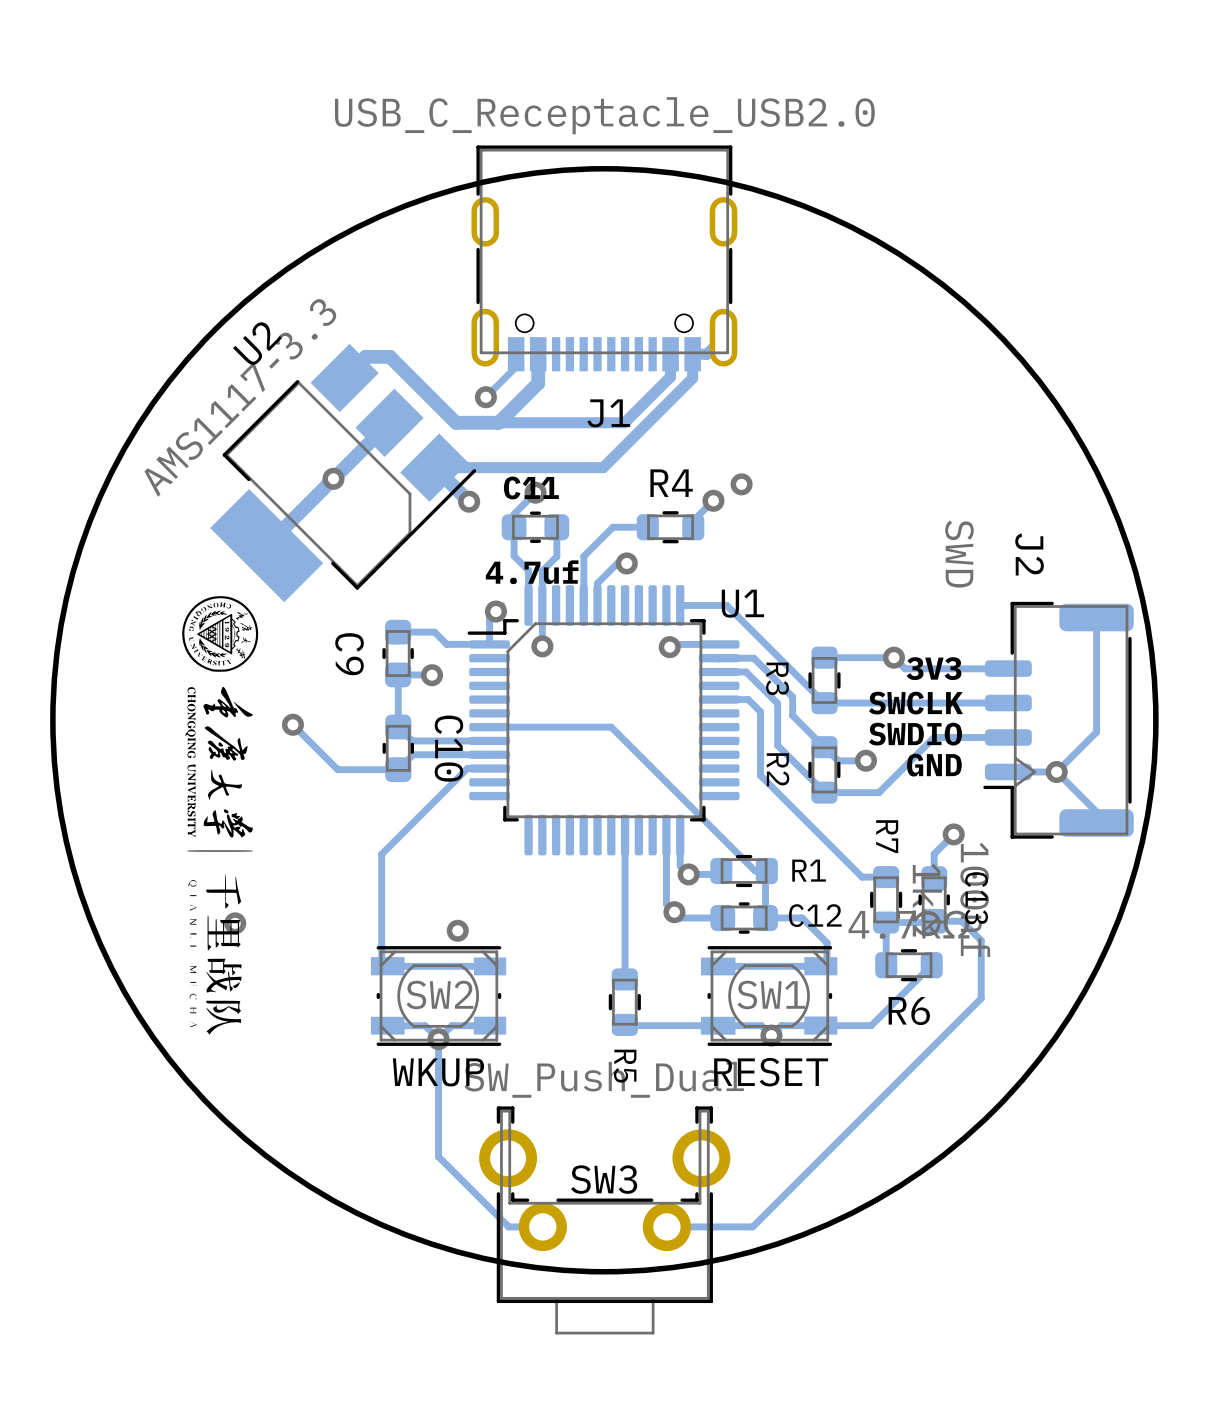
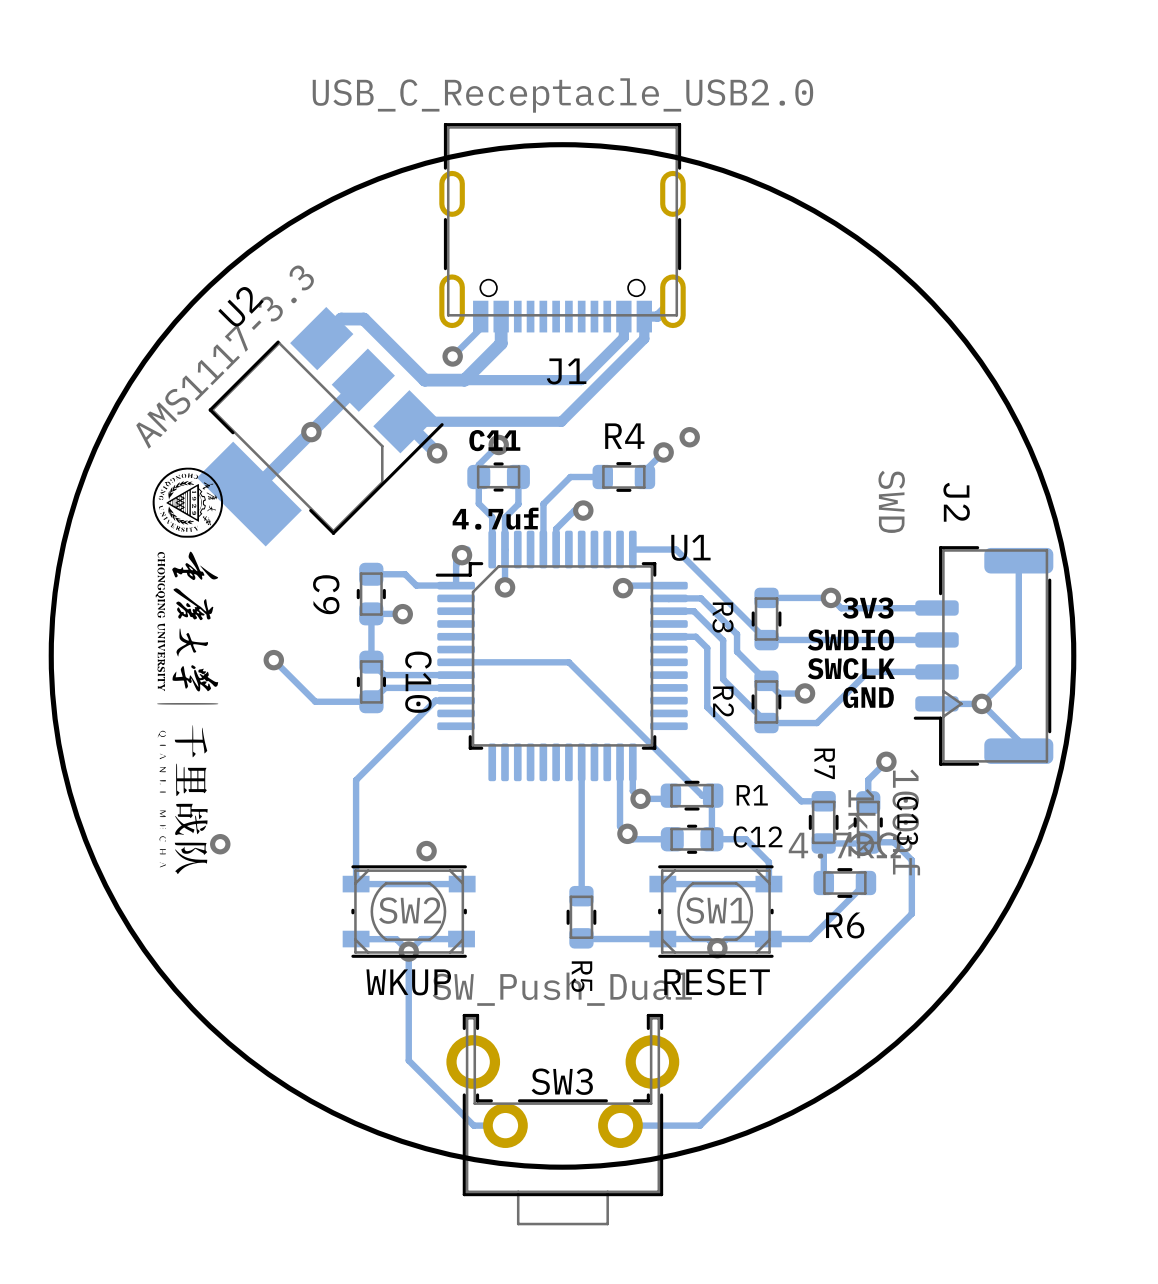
text: SWCLK (915, 703) -> SWDIO (850, 640)
text: SWDIO (915, 734) -> SWCLK (851, 668)
drawing position: (220, 815) -> (187, 670)
SW2 footprint: [370, 946, 507, 1046] -> [342, 865, 476, 958]
SW1 footprint: [700, 946, 838, 1046] -> [649, 865, 783, 958]

